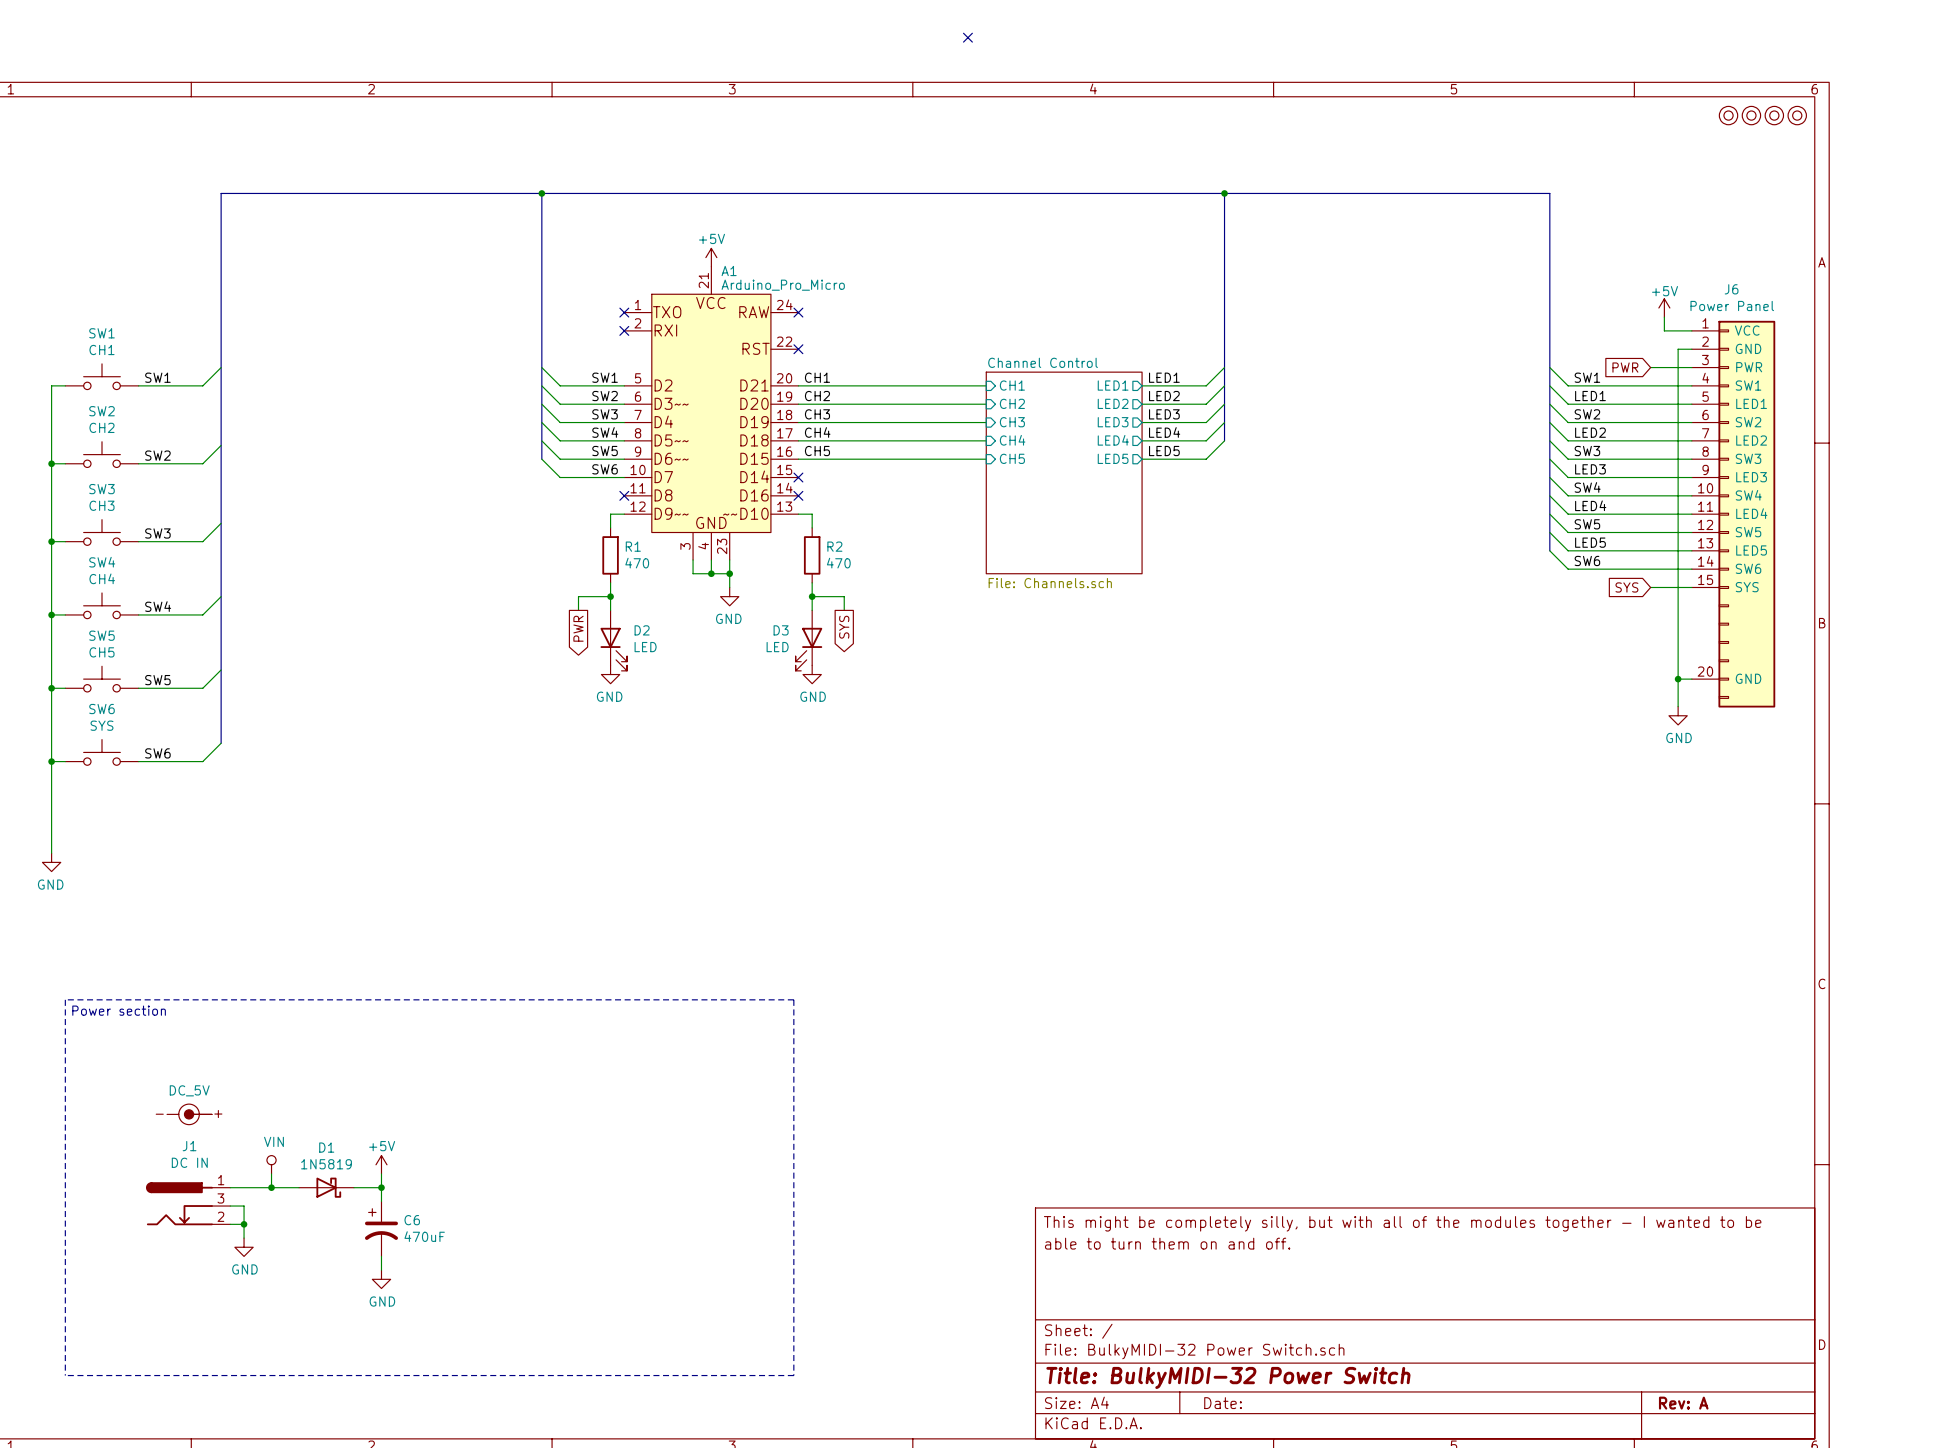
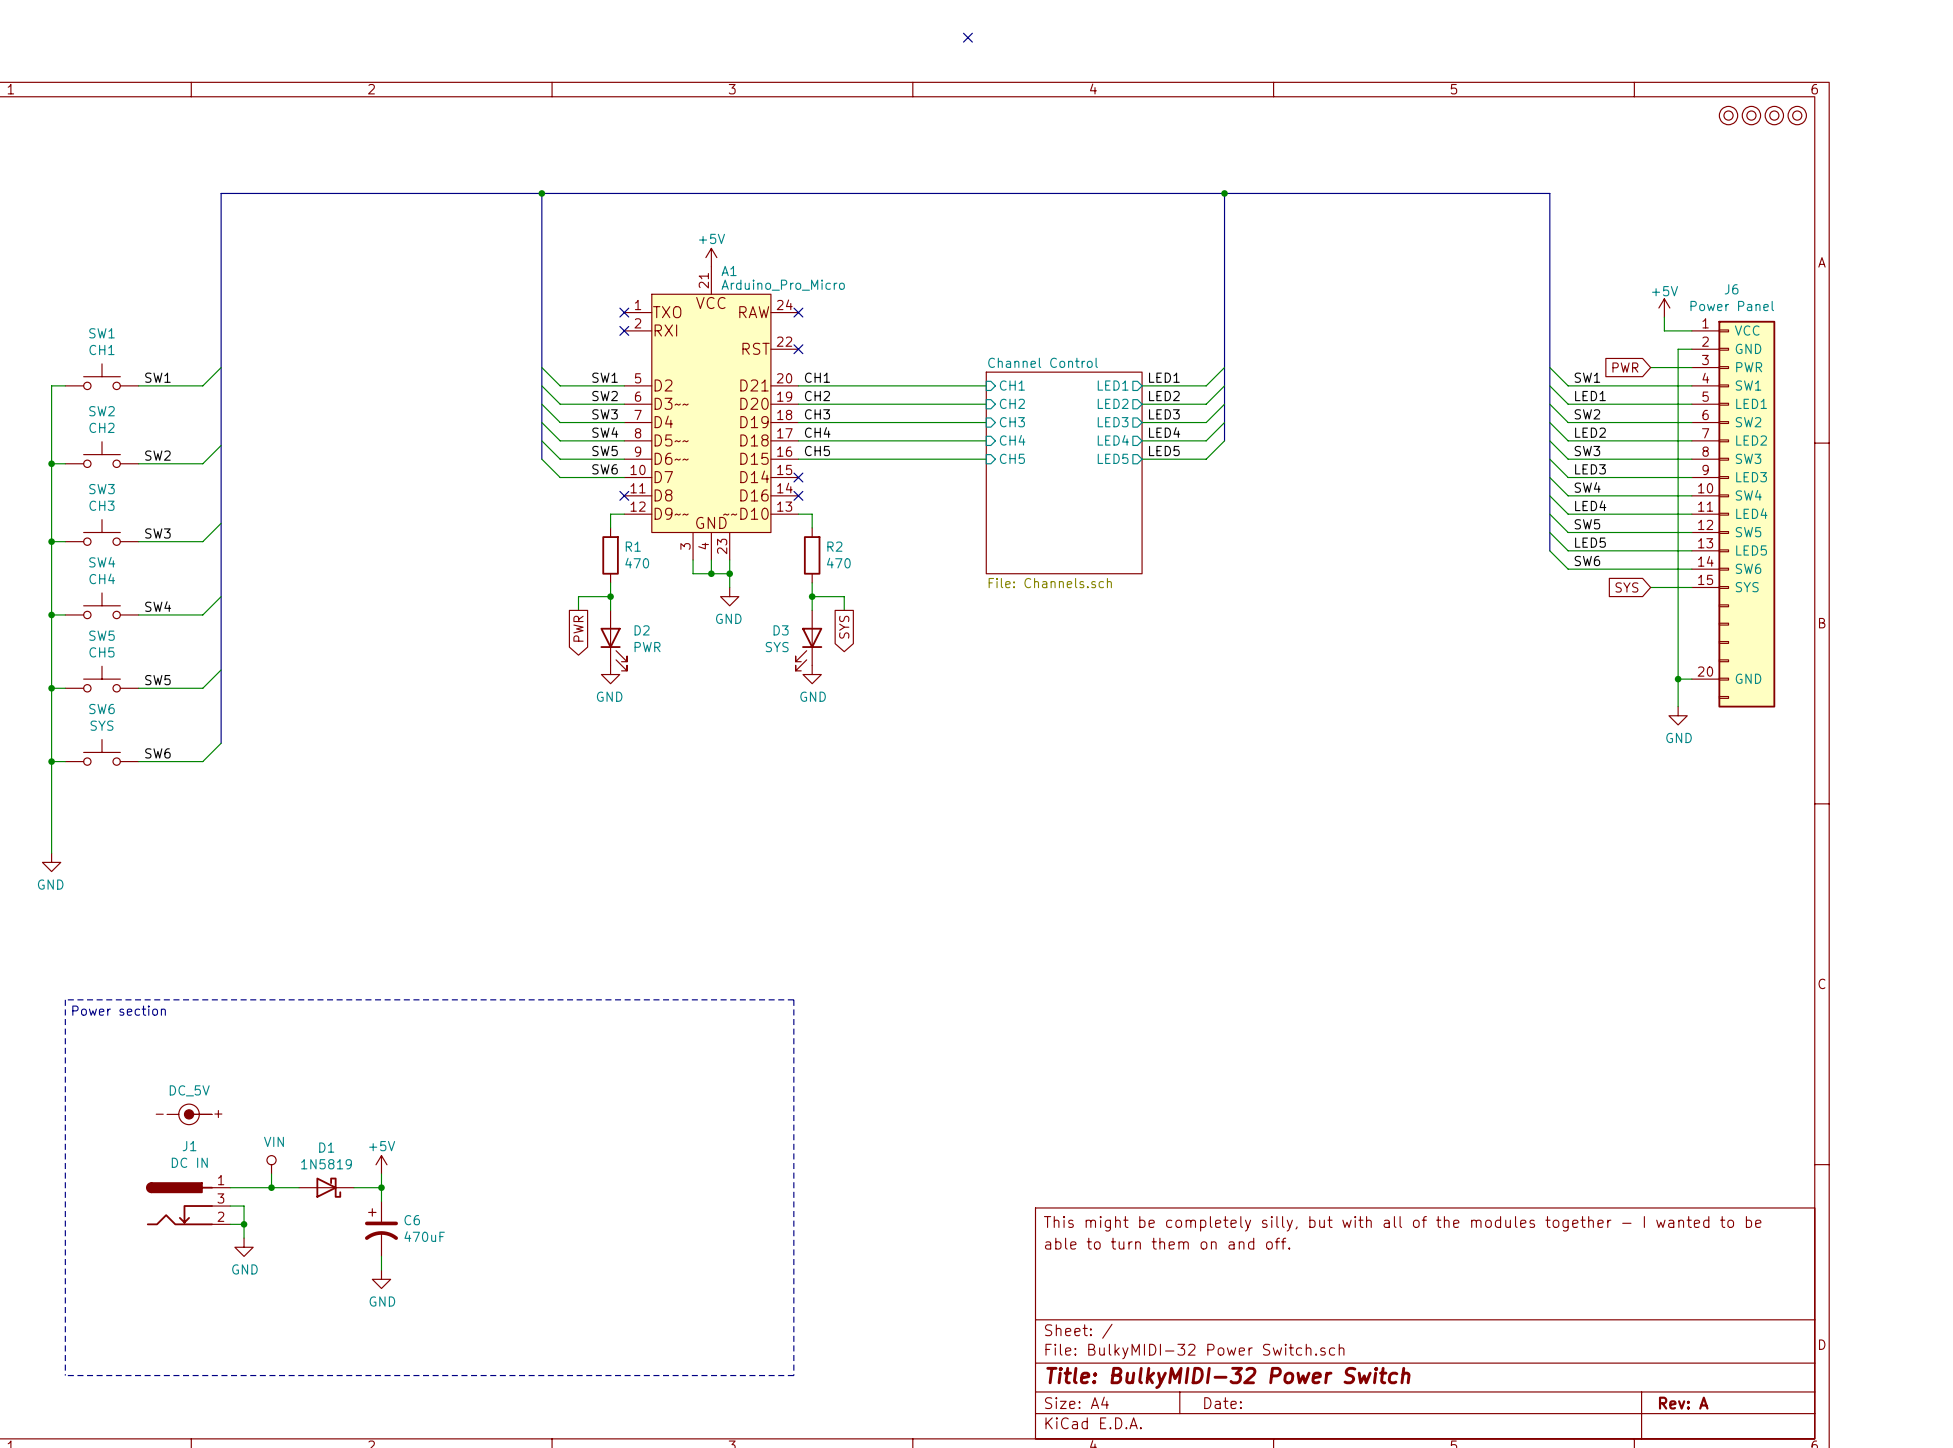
D2 value: LED (645, 647) -> PWR (647, 647)
D3 value: LED (777, 647) -> SYS (777, 647)

